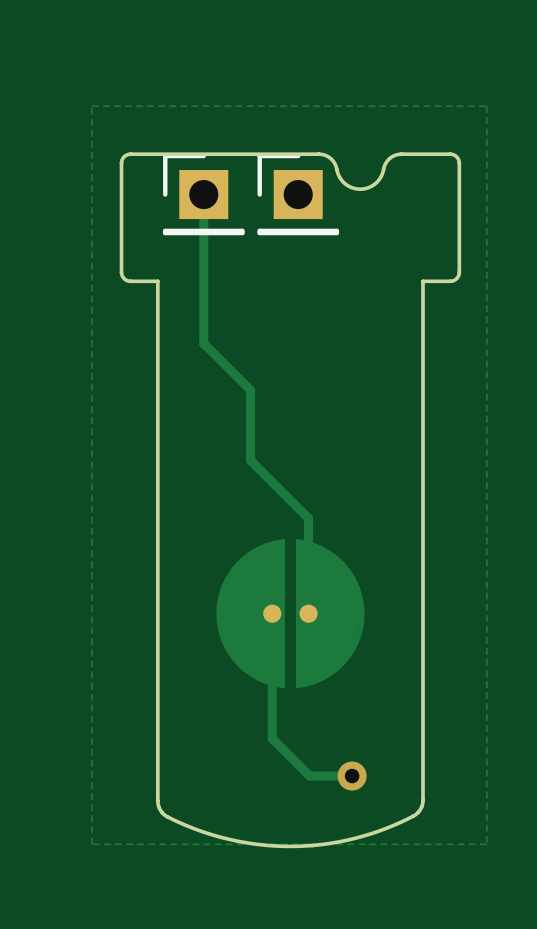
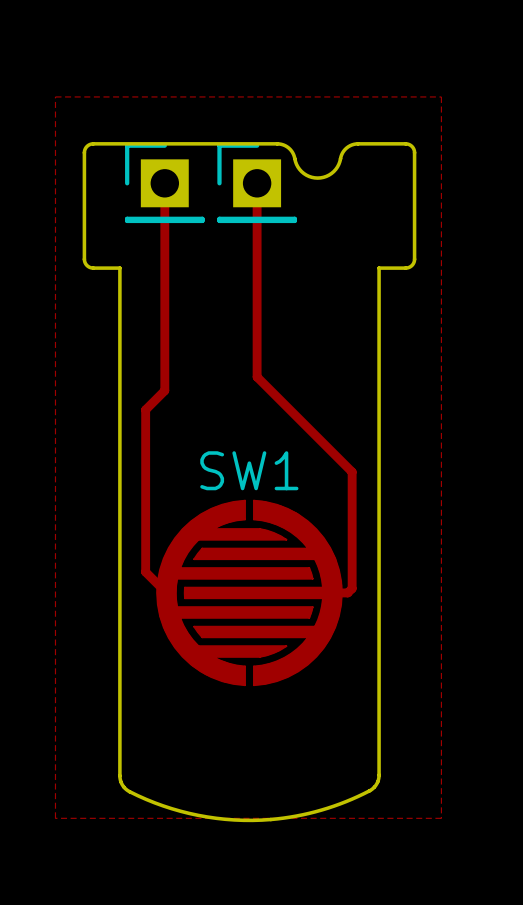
track: none -> (257, 183) (257, 377) (352, 472) (352, 588) (347, 592) (329, 592)
track: (203, 343) (250, 390) (250, 460) (308, 518) (308, 613) -> (164, 328) (164, 390) (145, 409) (145, 572) (166, 592)
track: (272, 613) (272, 738) (309, 776) (352, 776) -> none
part: (290, 613) -> none
SW1: none -> (249, 592)
via: (352, 776) -> none

